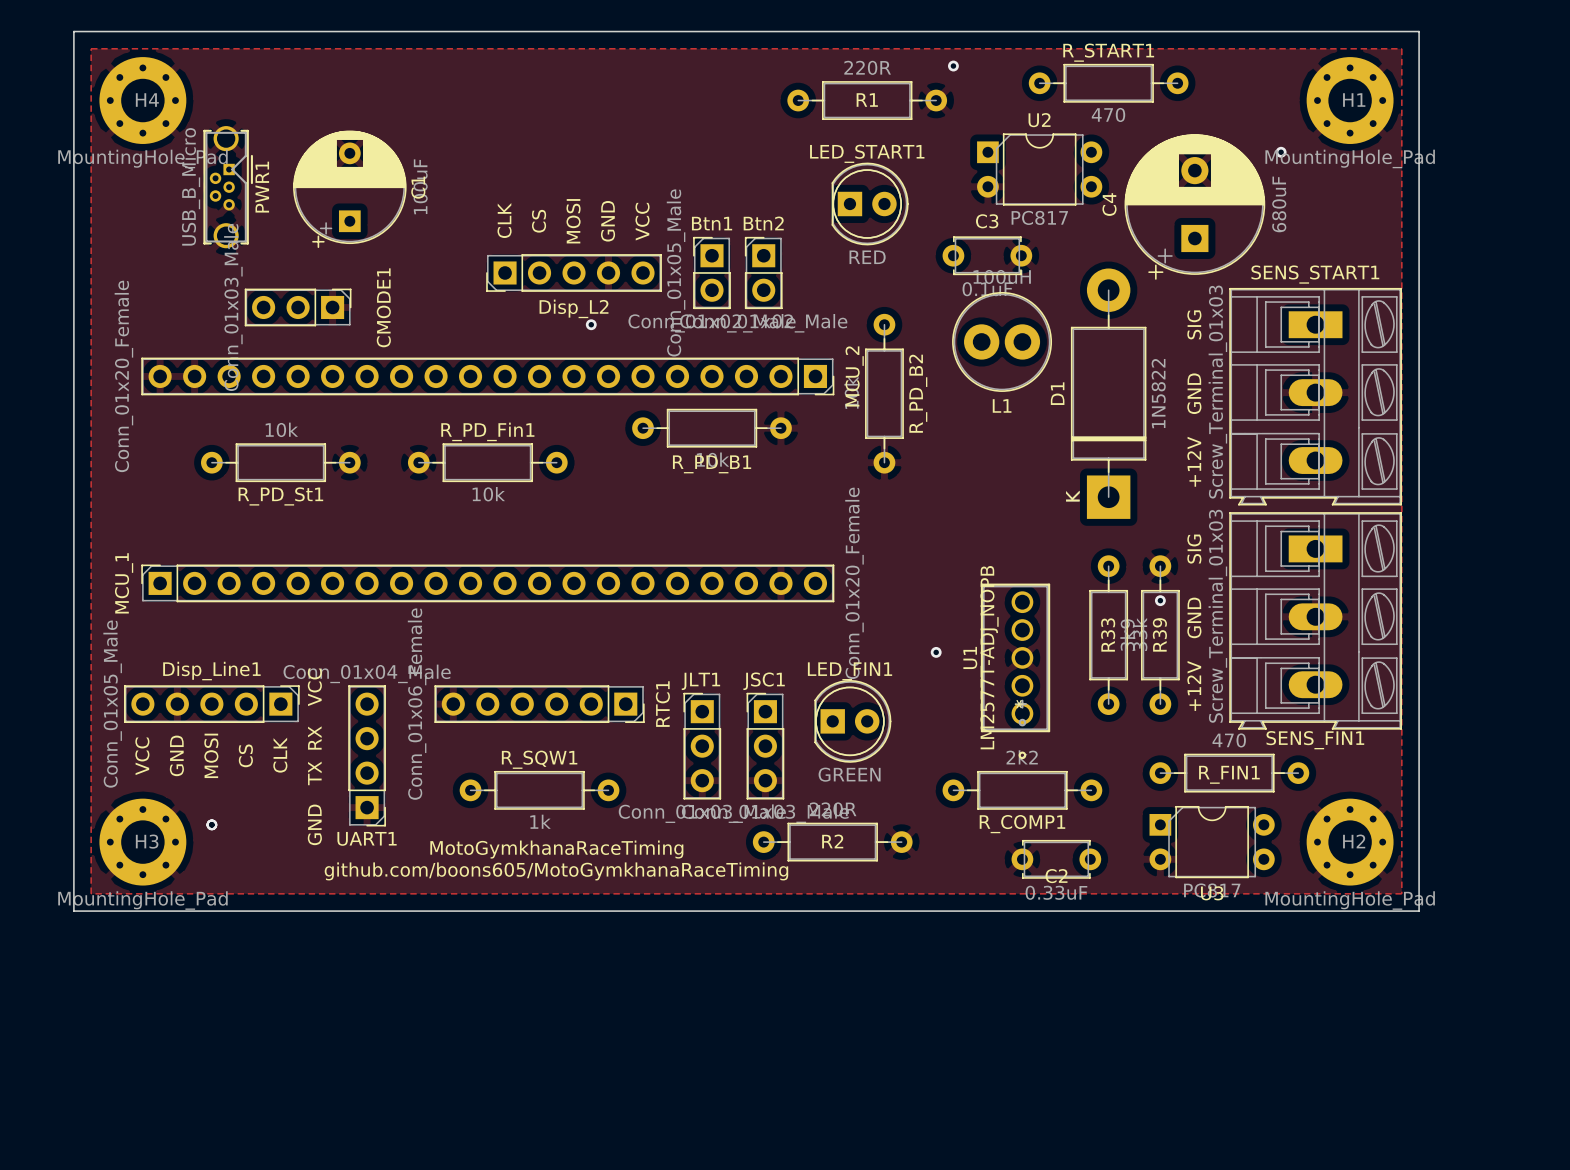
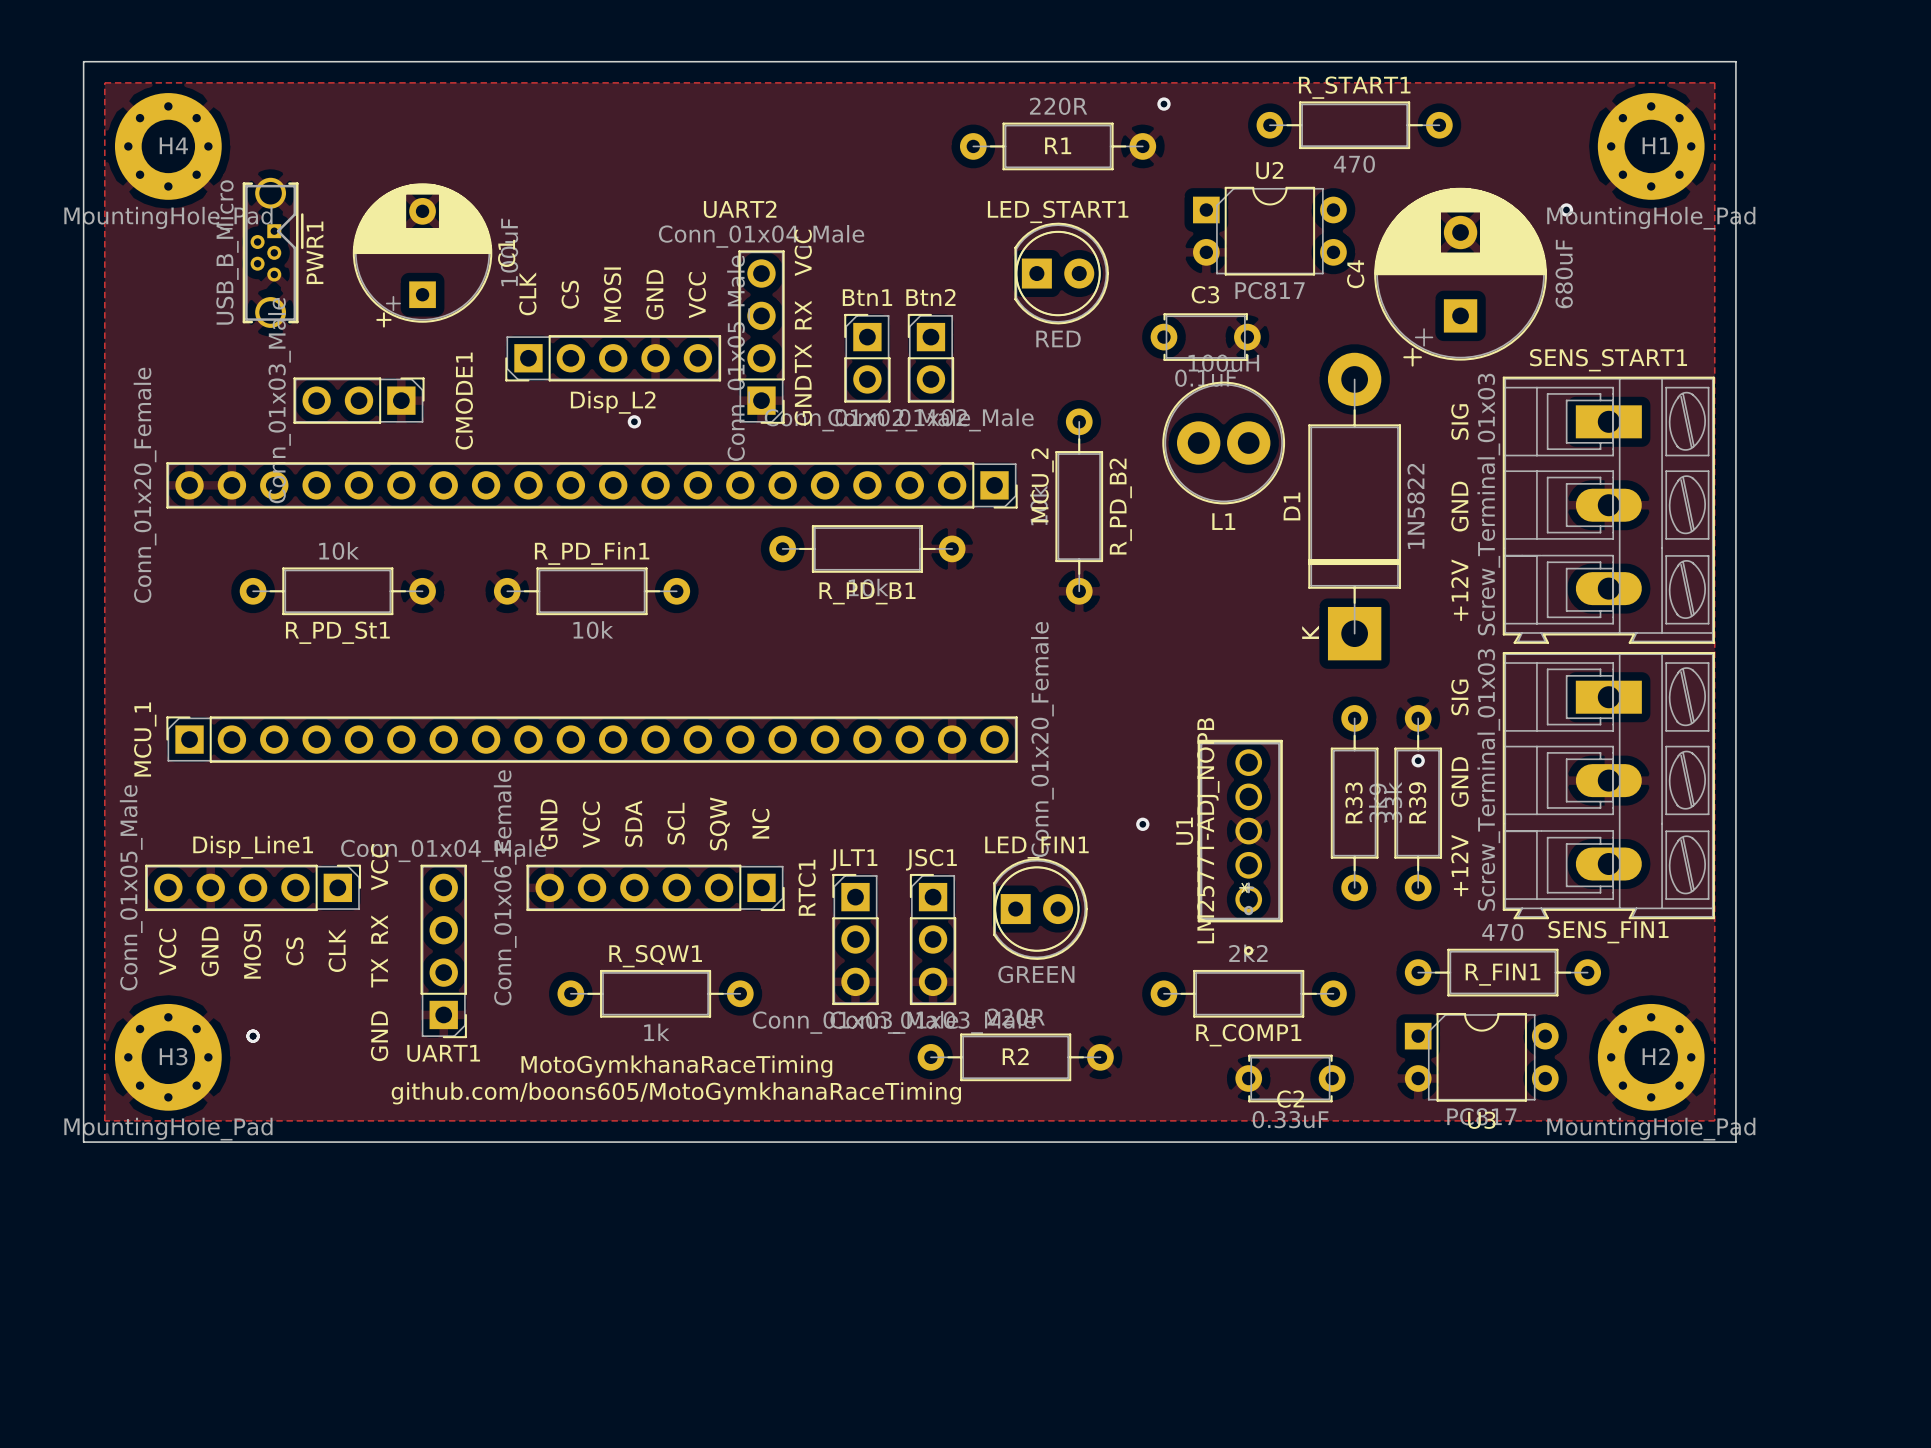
UART2: none -> Conn_01x04_Male (761, 337)
Disp_L2 position: (574, 272) -> (613, 358)
via position: (591, 324) -> (634, 421)
RTC1 text: none -> SDA (633, 823)
RTC1 text: none -> SCL (676, 823)
RTC1 text: none -> NC (760, 823)
RTC1 text: none -> GND (549, 824)
RTC1 text: none -> VCC (591, 824)
RTC1 text: none -> SQW (719, 823)

